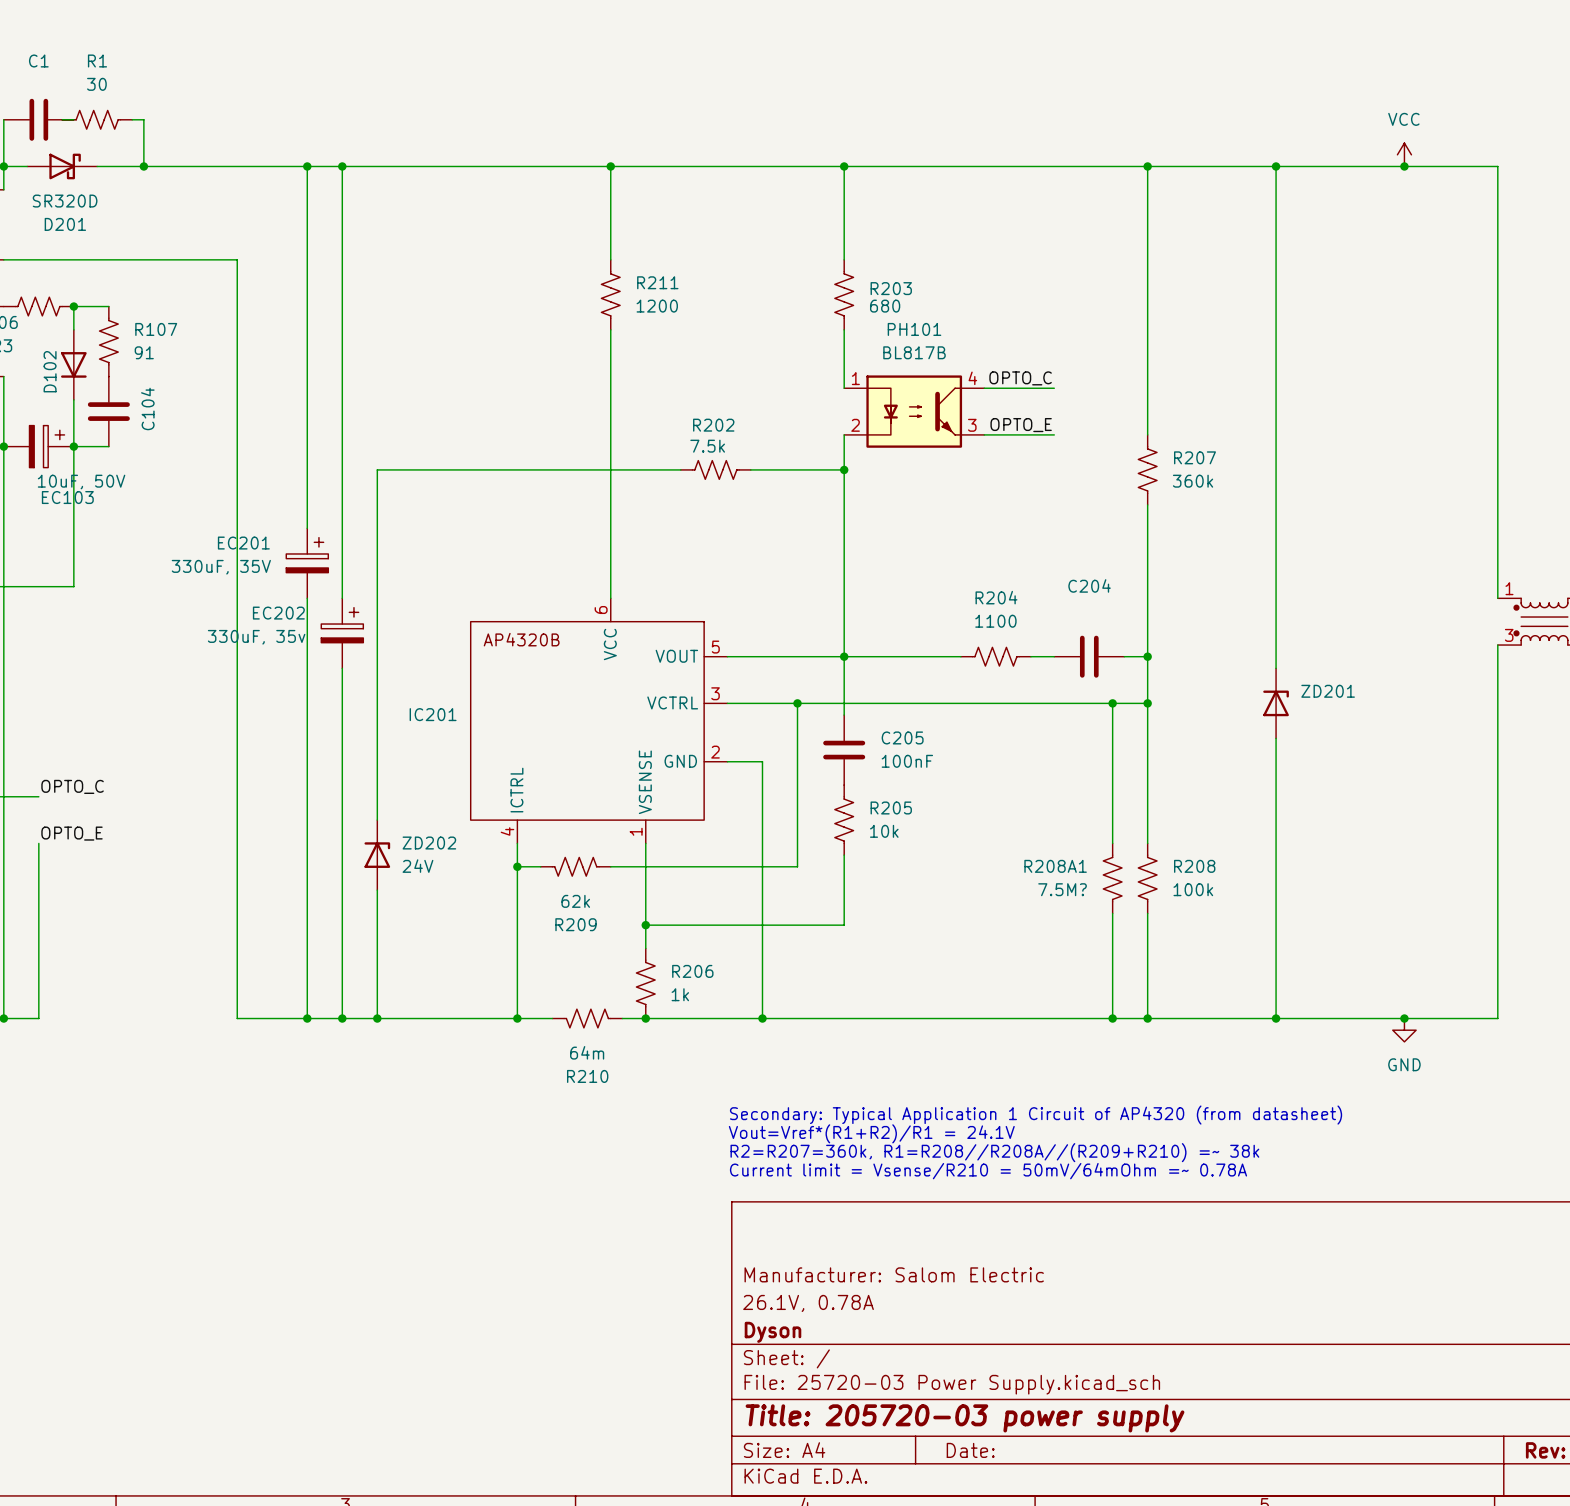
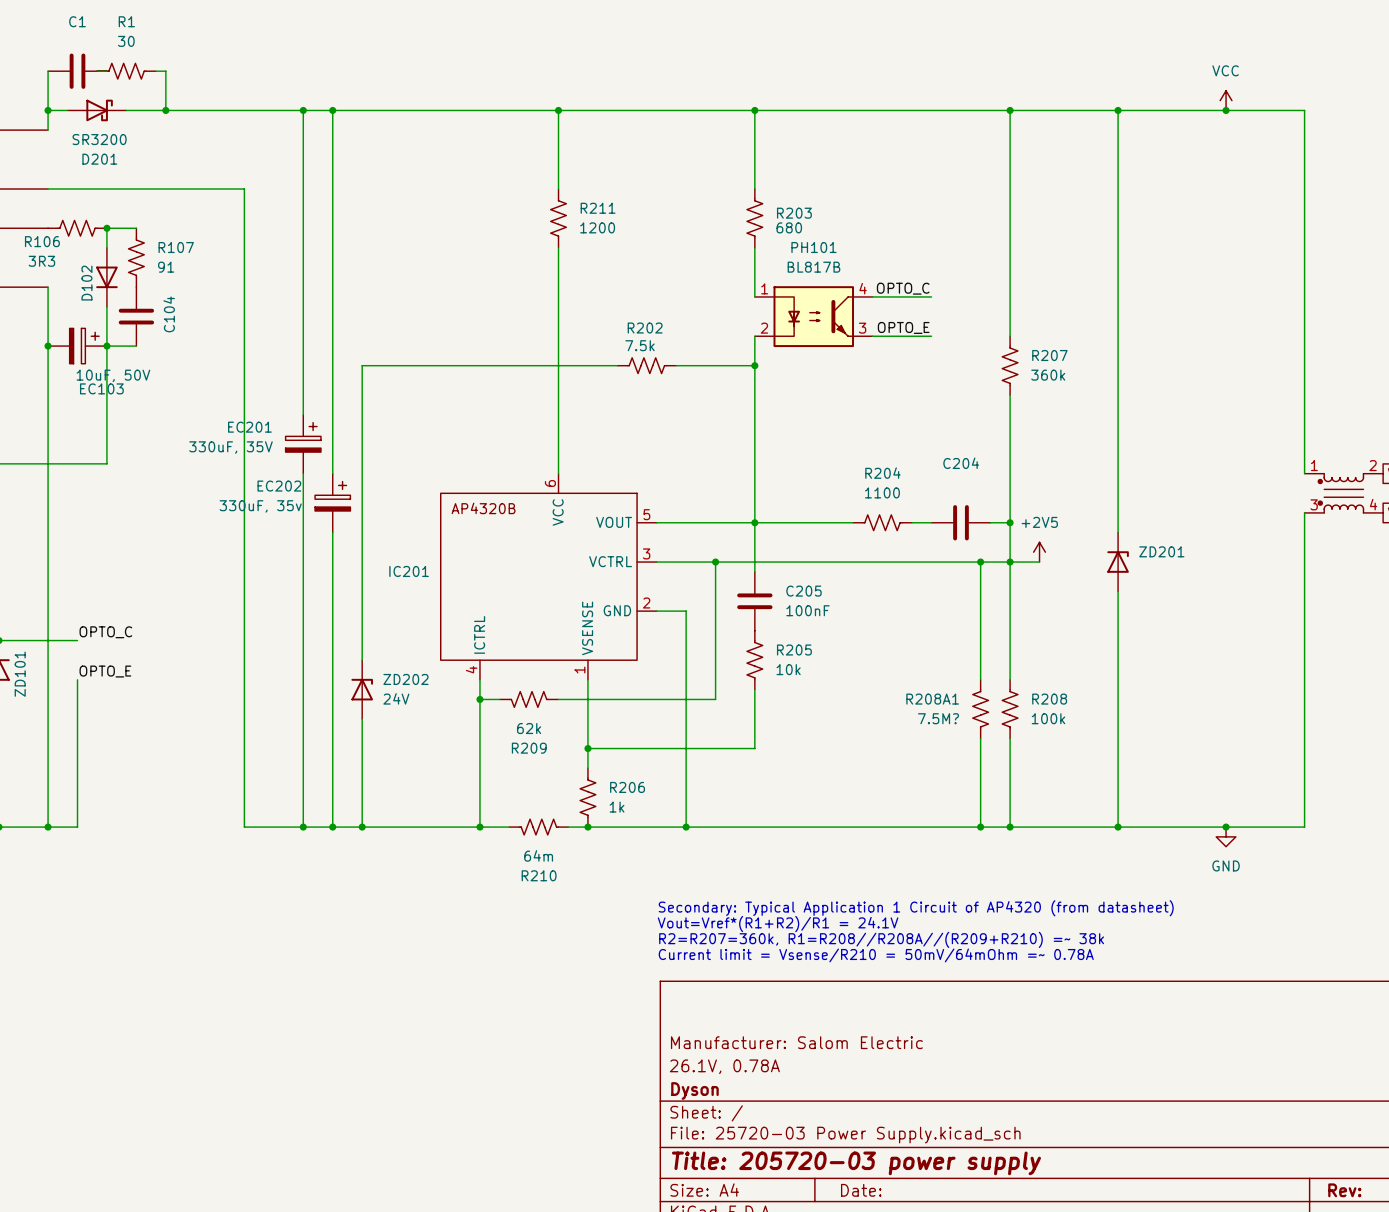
D201 value: SR320D (65, 201) -> SR3200 (99, 139)
power symbol: none -> +2V5 (1039, 552)
wire: none -> (1010, 562) (1039, 562)

